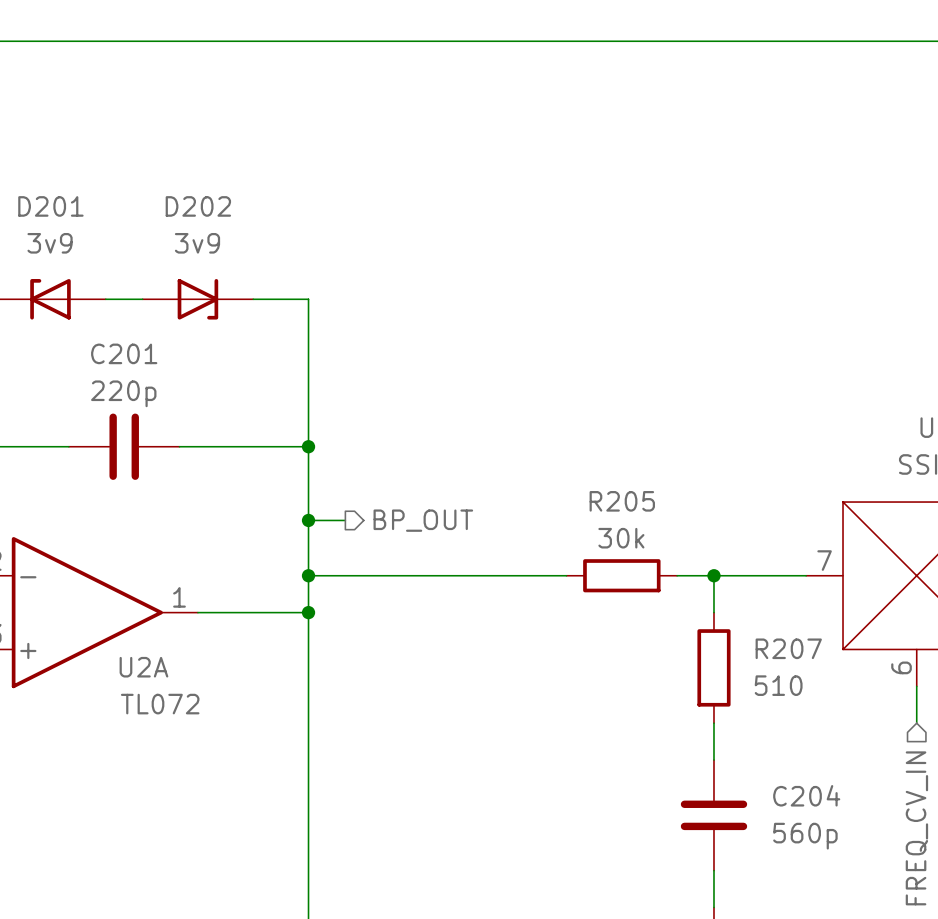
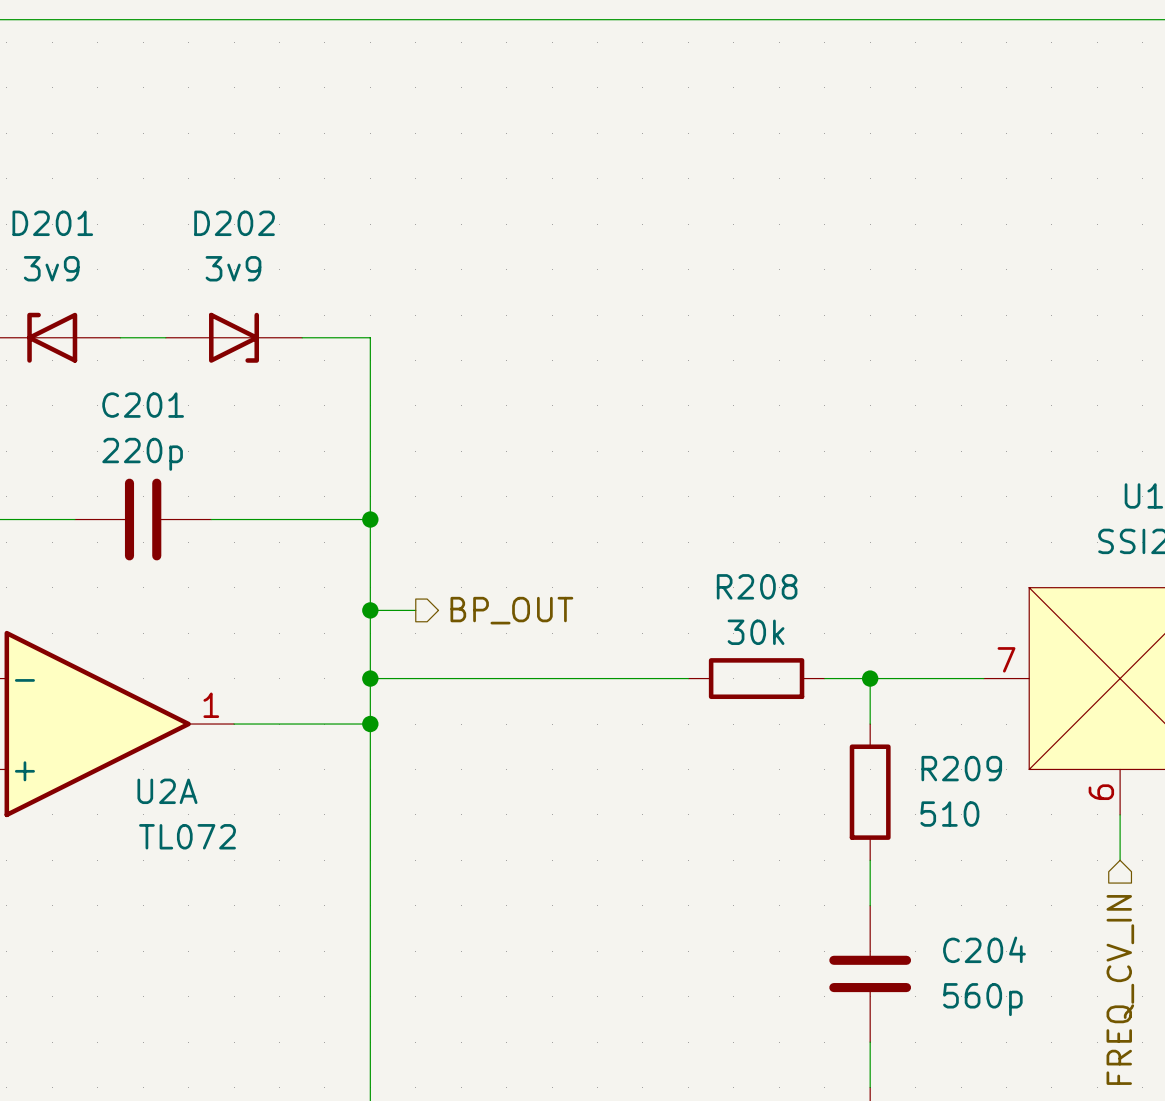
R205 name: R205 (622, 501) -> R208 (757, 586)
R207 name: R207 (788, 648) -> R209 (961, 768)

